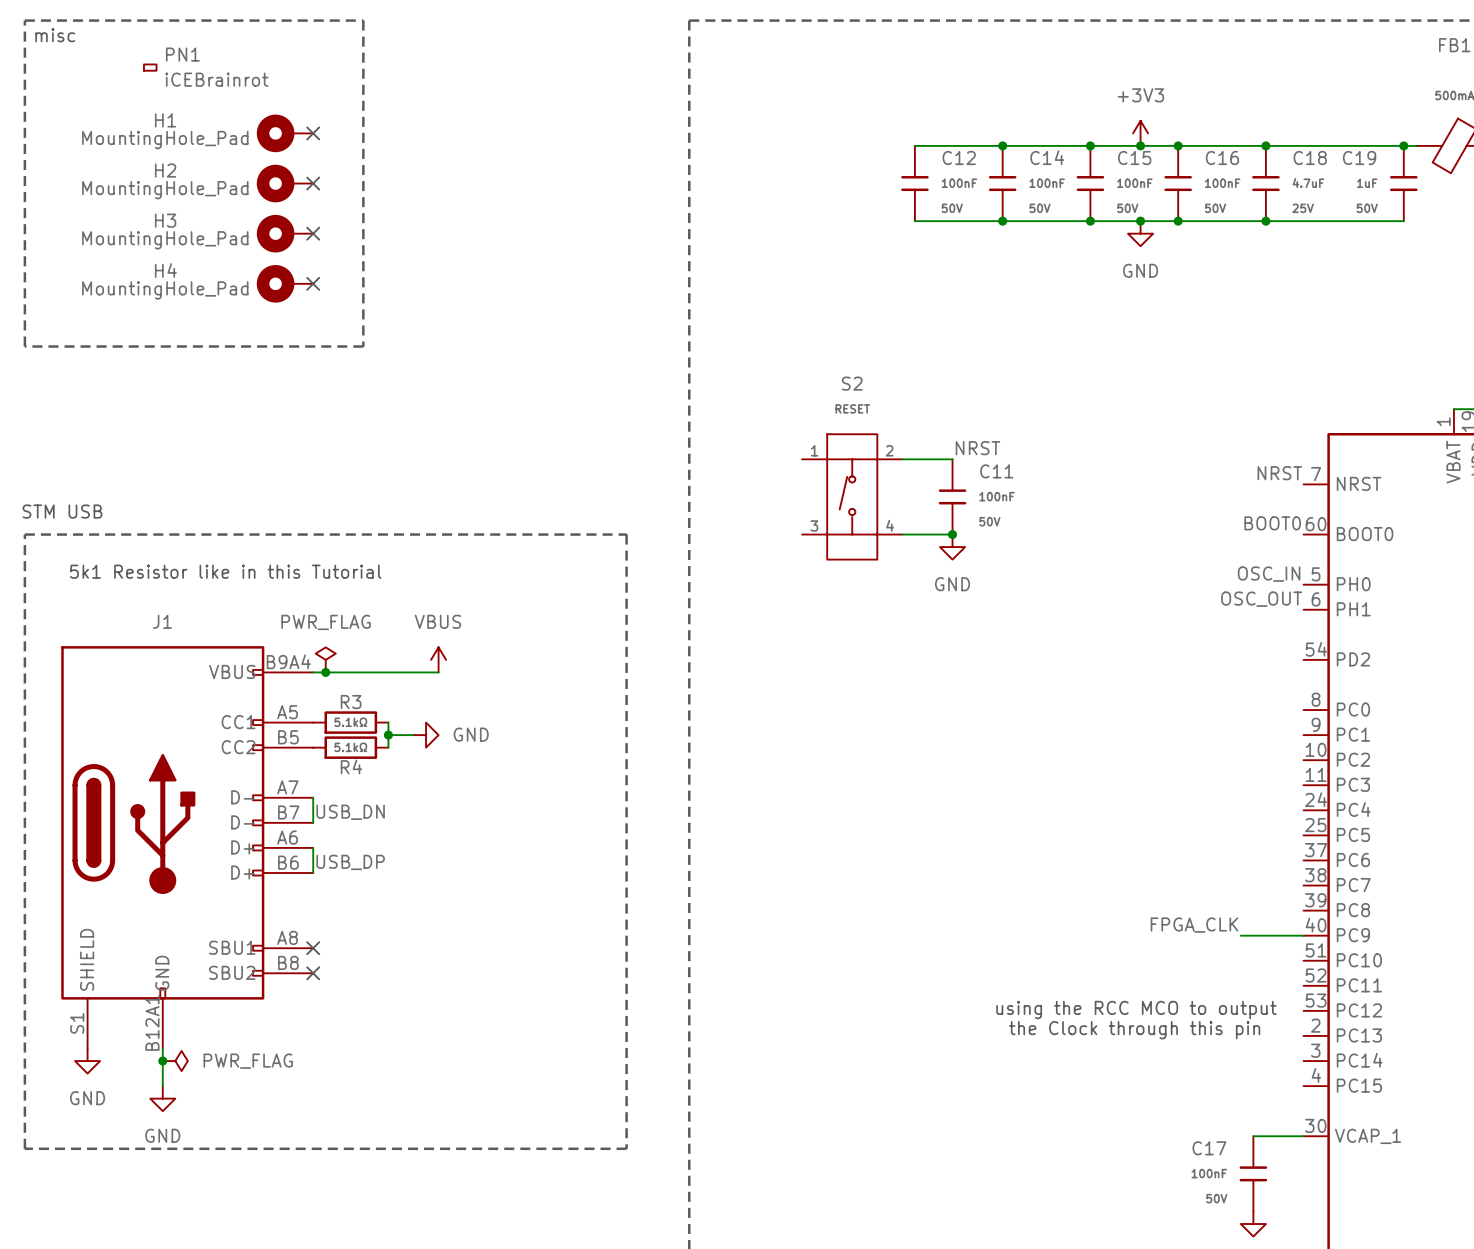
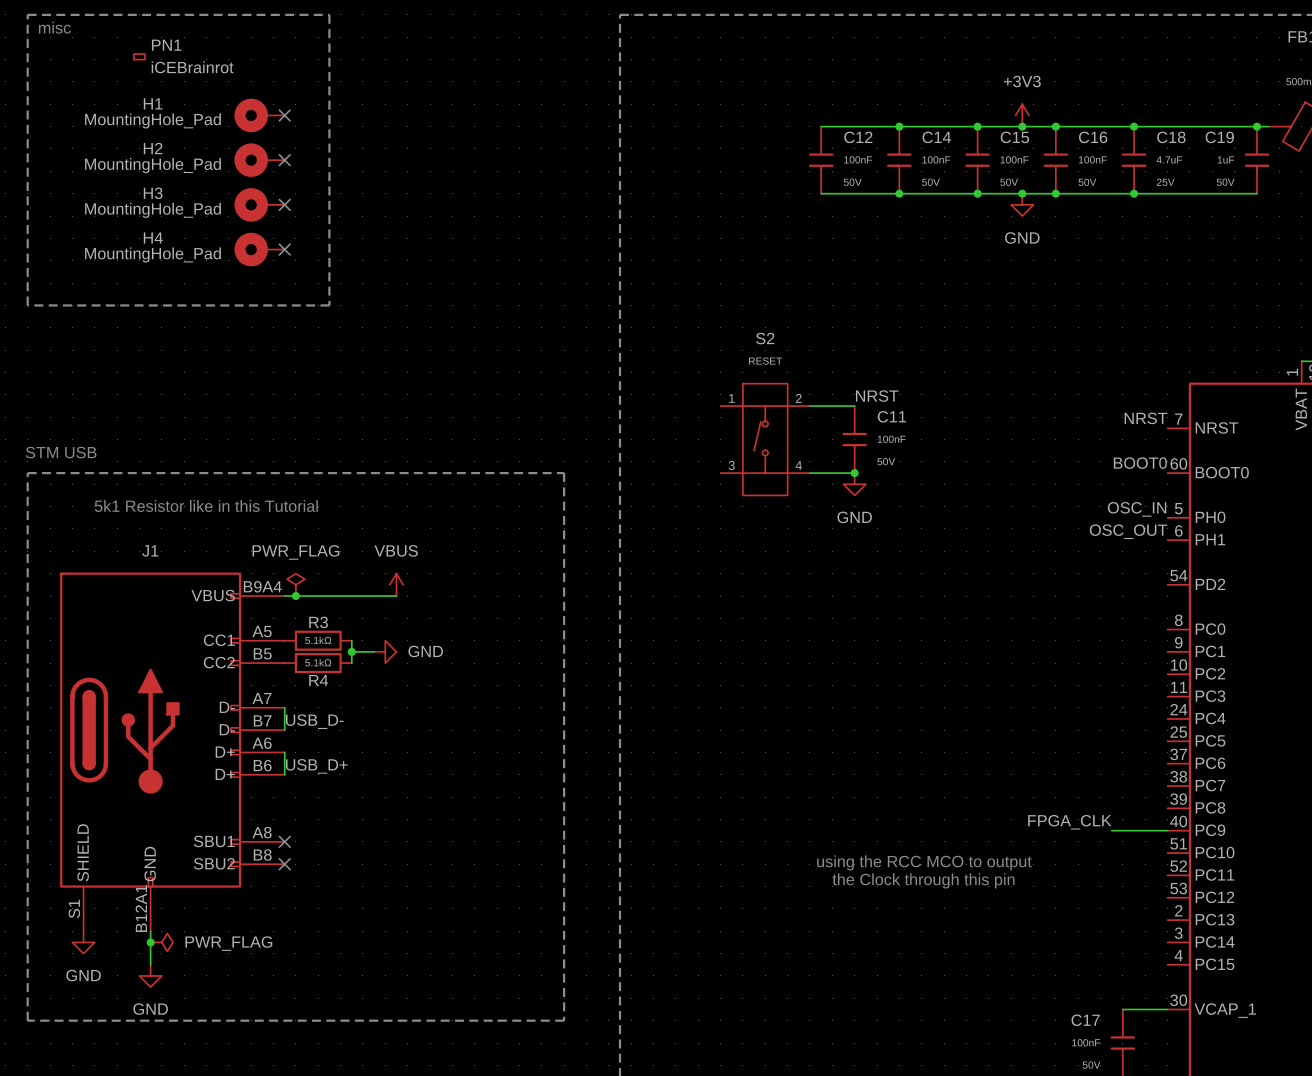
label: USB_DN (350, 812) -> USB_D- (314, 721)
label: USB_DP (350, 862) -> USB_D+ (316, 766)
text position: using the RCC MCO to output (1136, 1009) -> using the RCC MCO to output (924, 862)
text position: the Clock through this pin (1134, 1030) -> the Clock through this pin (923, 880)

